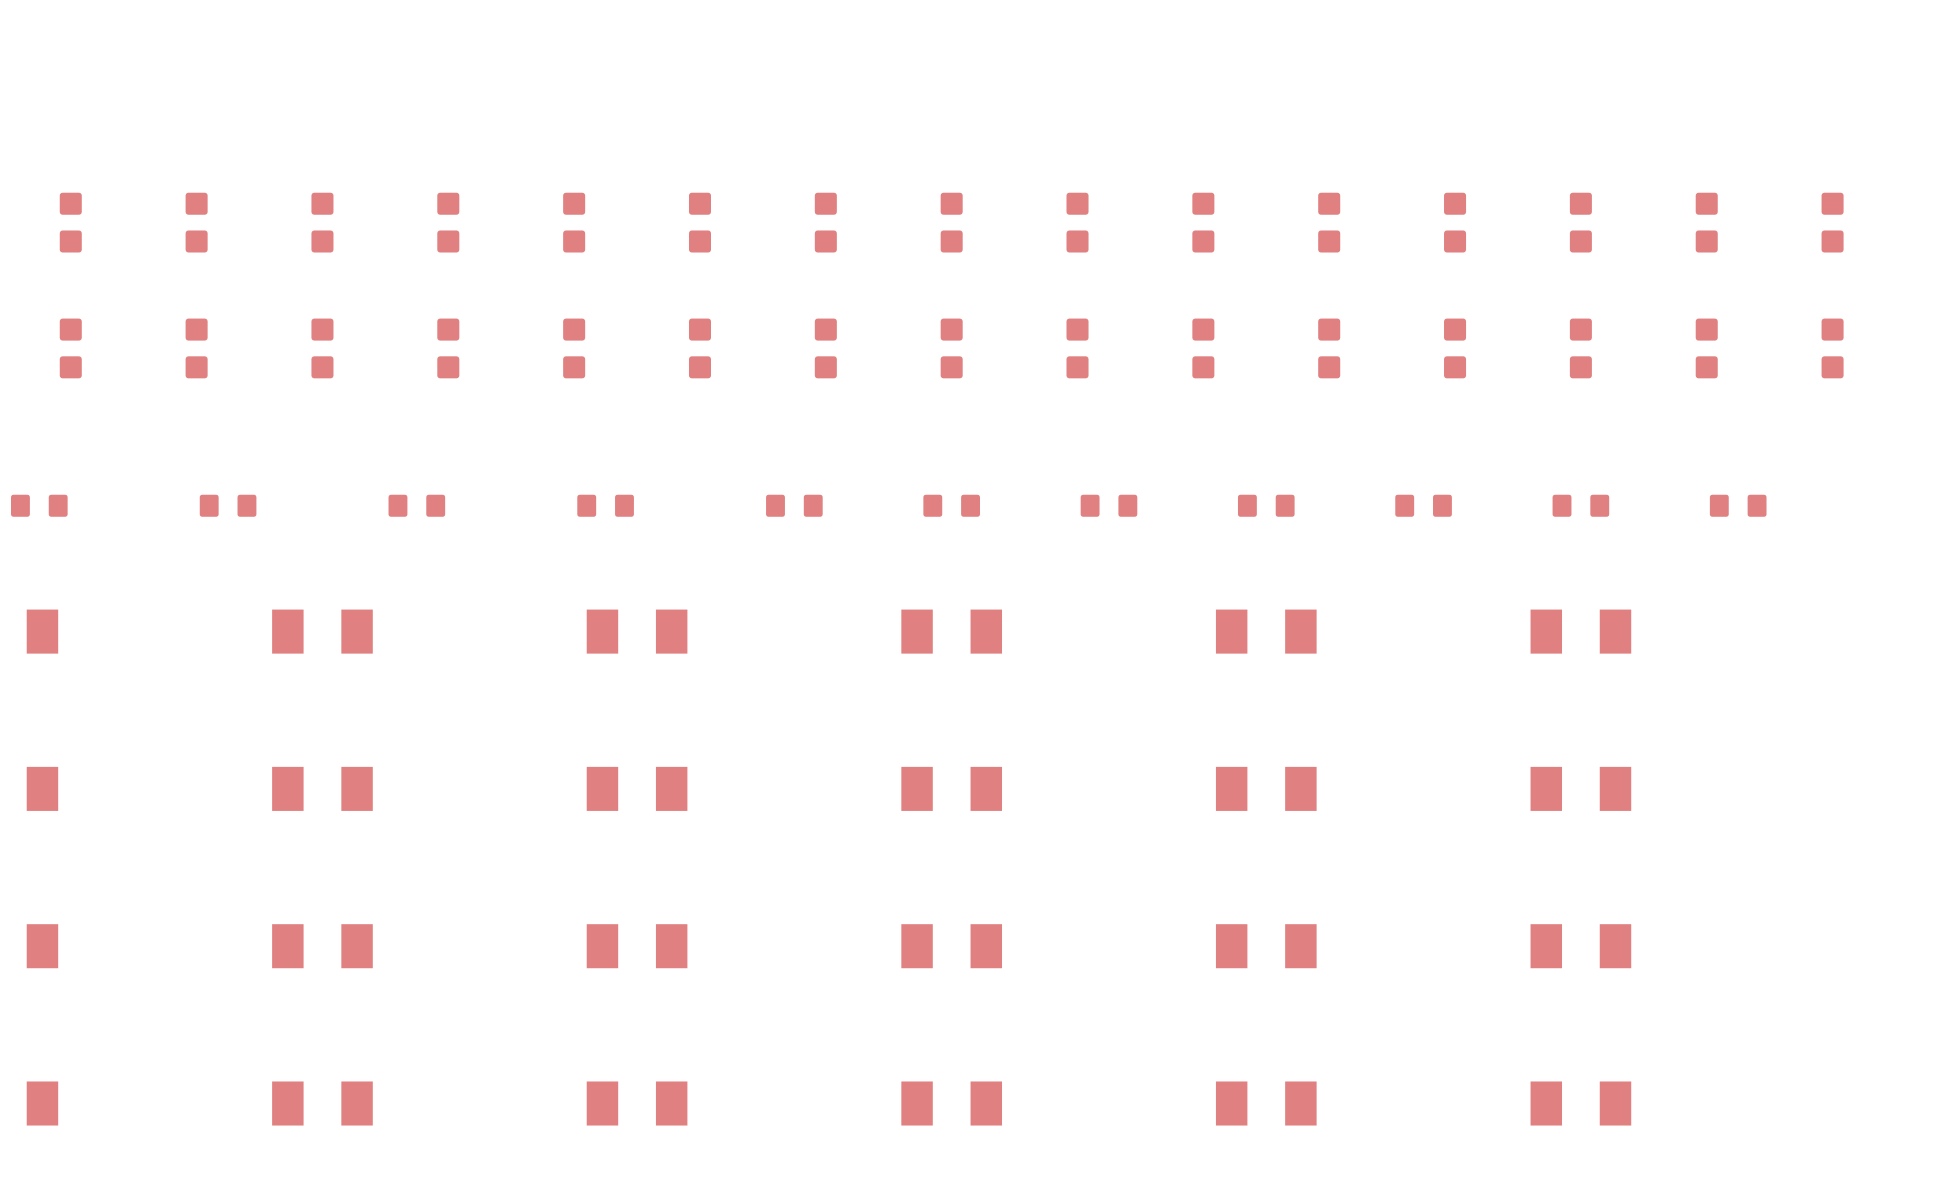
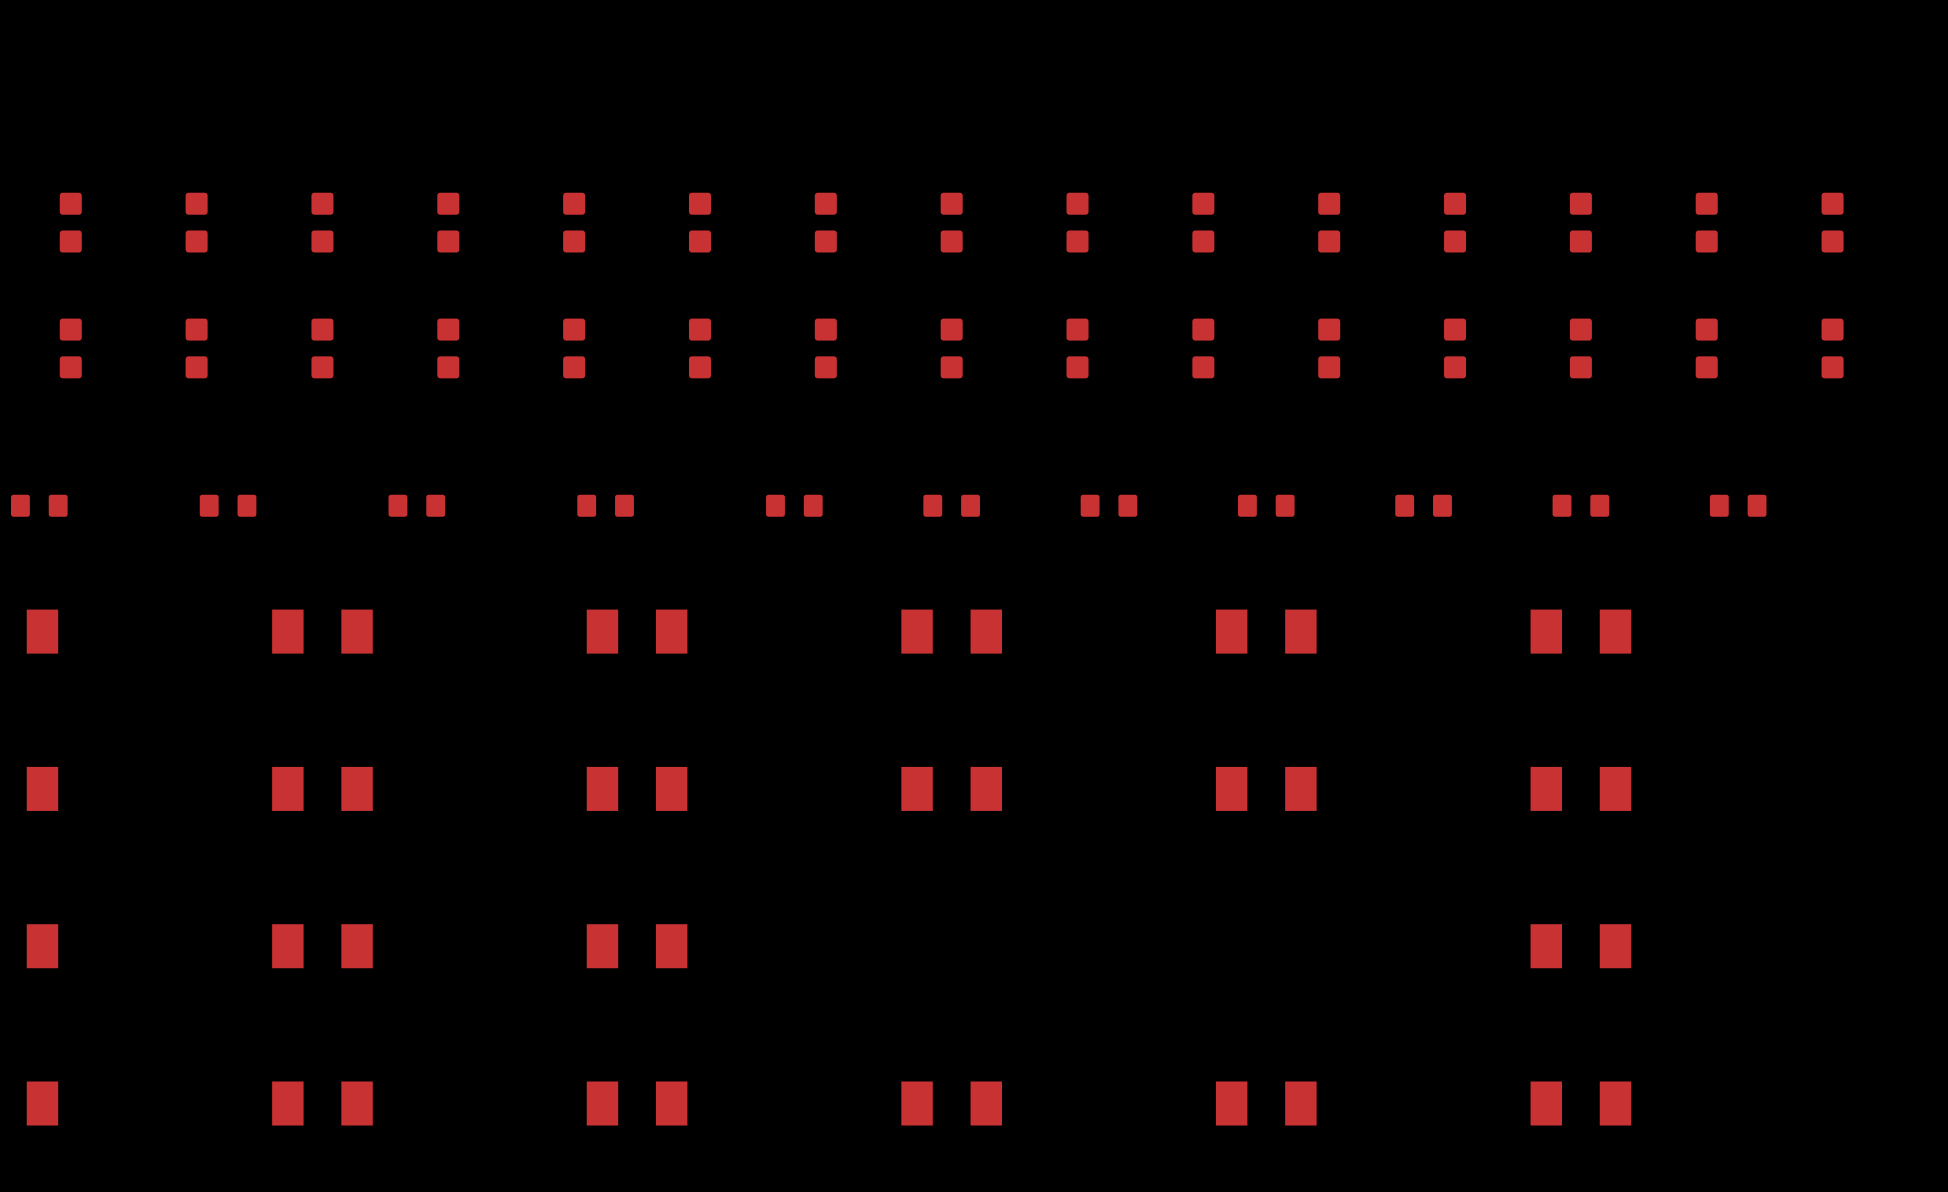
part: (951, 946) -> none
part: (1266, 946) -> none

